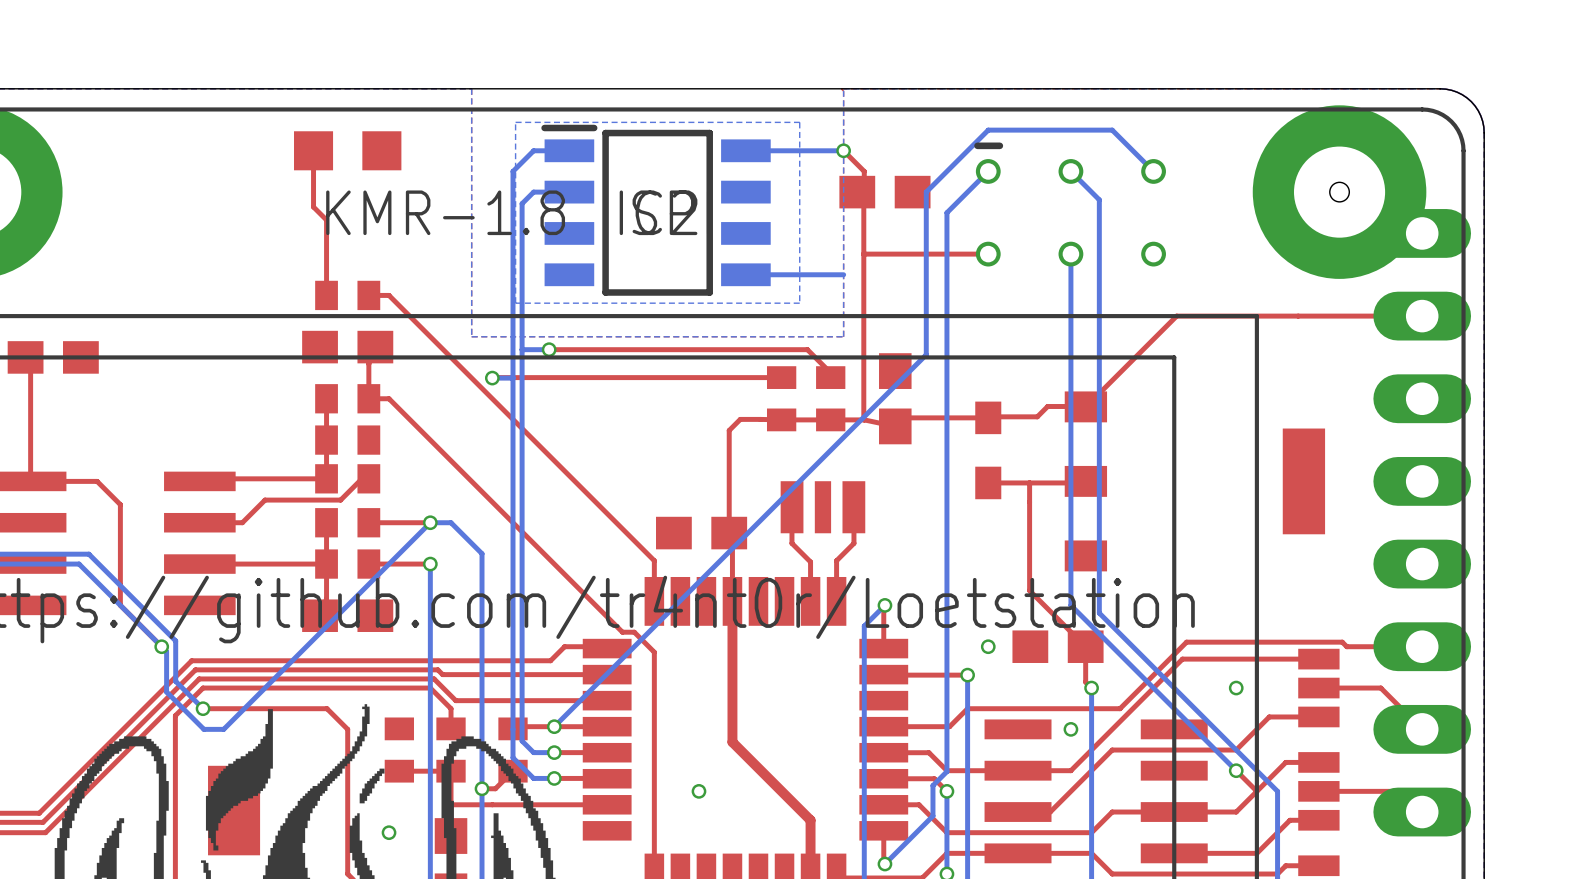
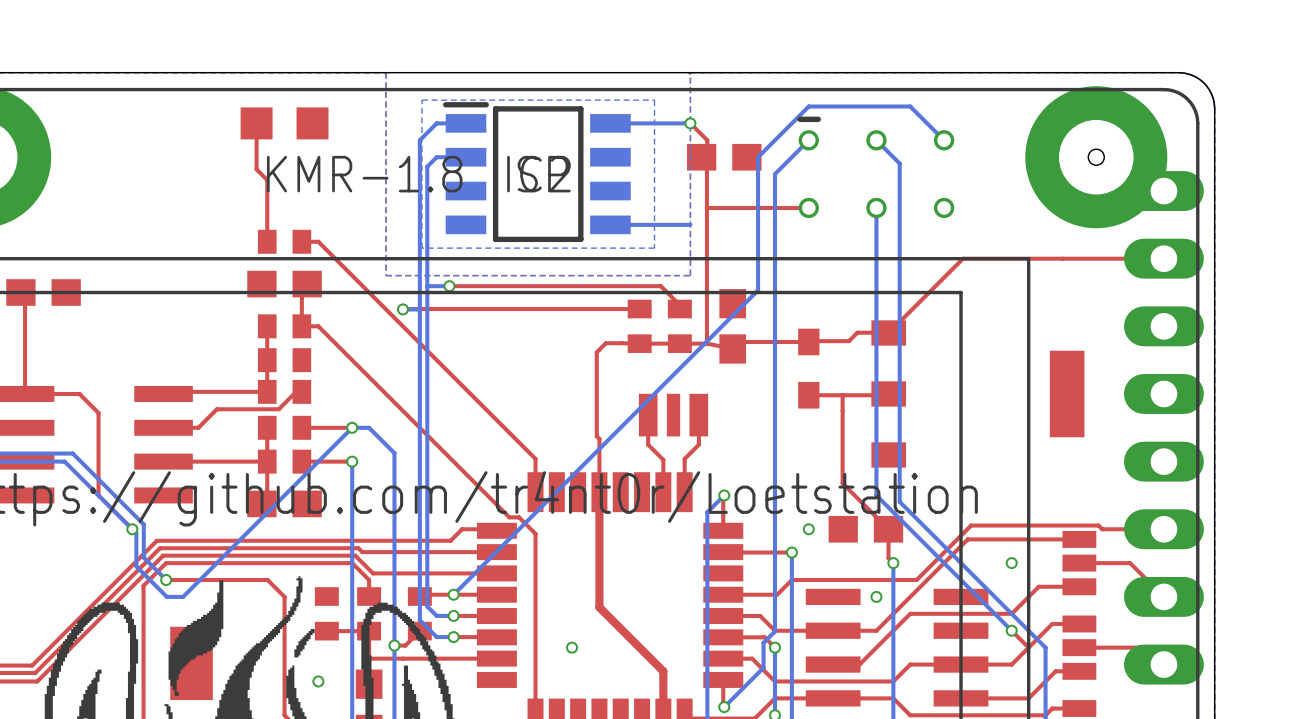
part: (701, 533) -> none

